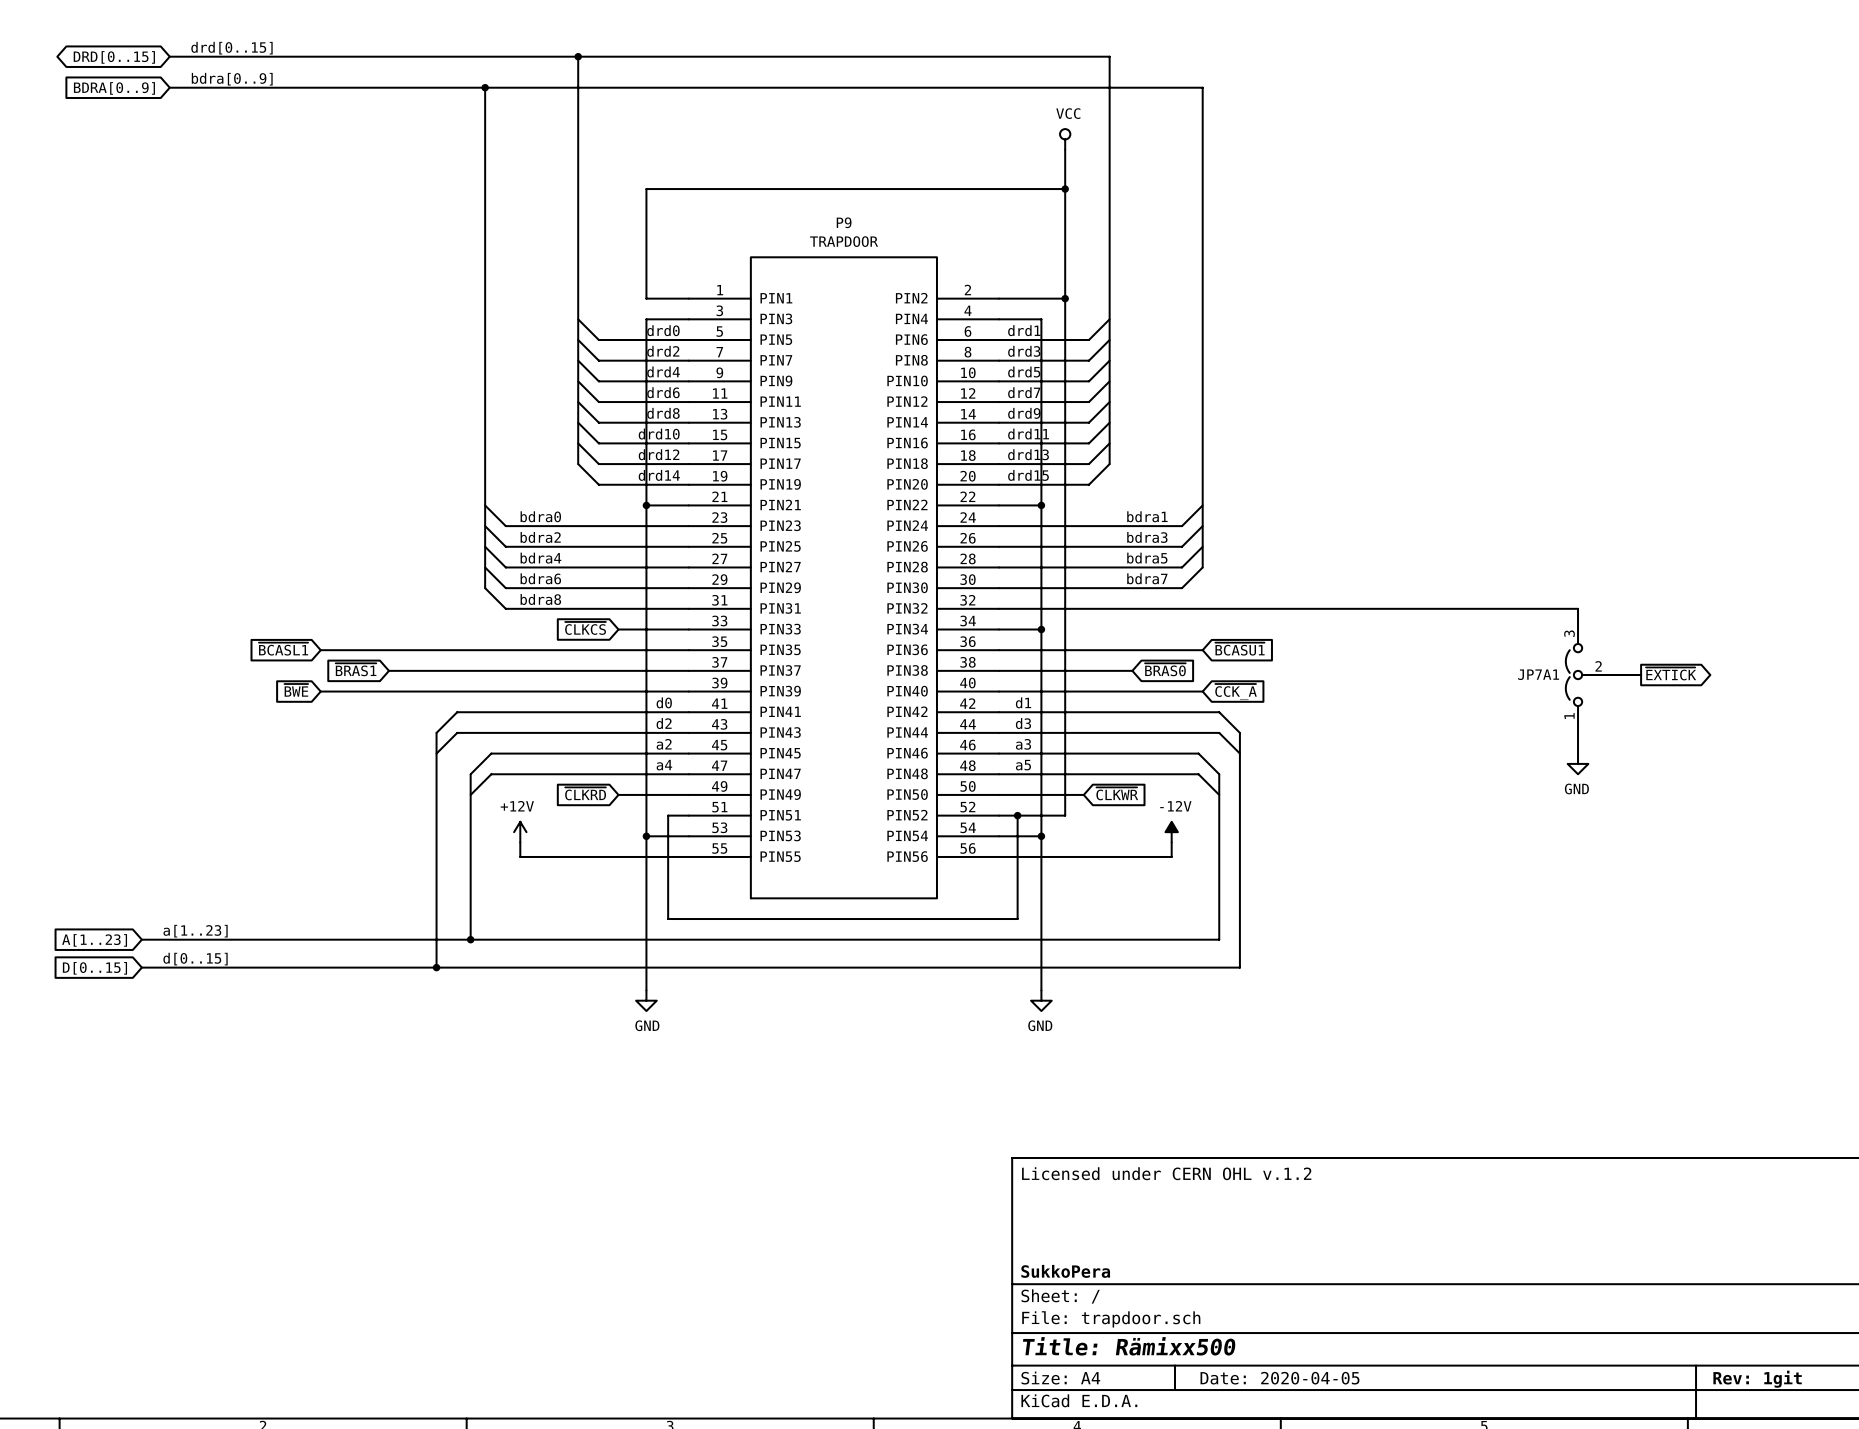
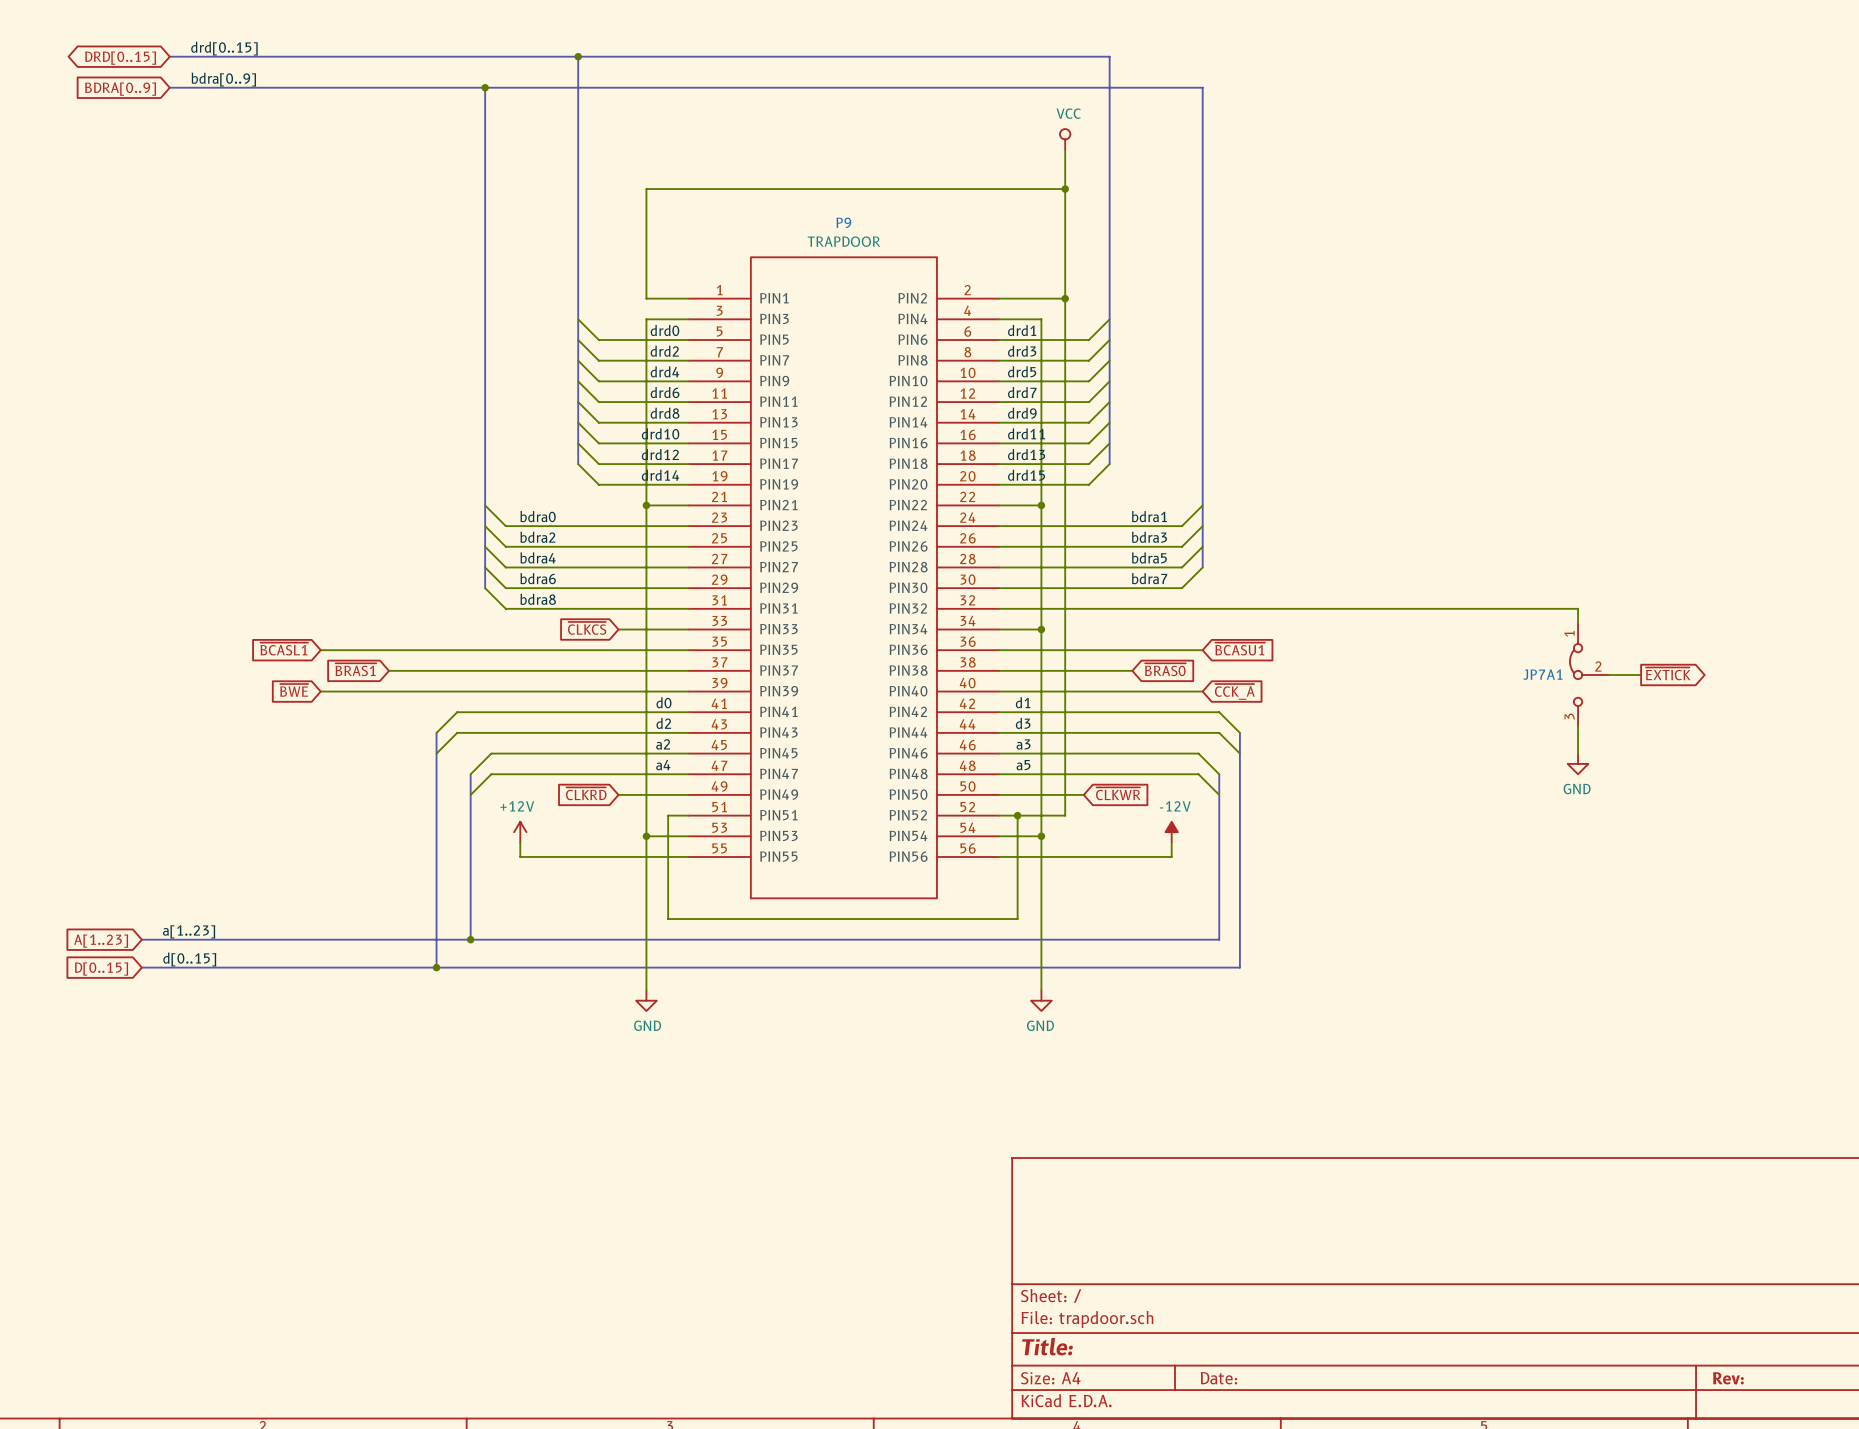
JP7A1 symbol: [1565, 623, 1610, 727] -> [1569, 623, 1610, 727]
title block: Licensed under CERN OHL v.1.2 (1166, 1173) -> none
title block: SukkoPera (1065, 1271) -> none
title block: Title: Rämixx500 (1129, 1346) -> Title: (1047, 1346)
title block: Date: 2020-04-05 (1279, 1378) -> Date: (1218, 1378)
title block: Rev: 1git (1757, 1379) -> Rev: (1728, 1378)

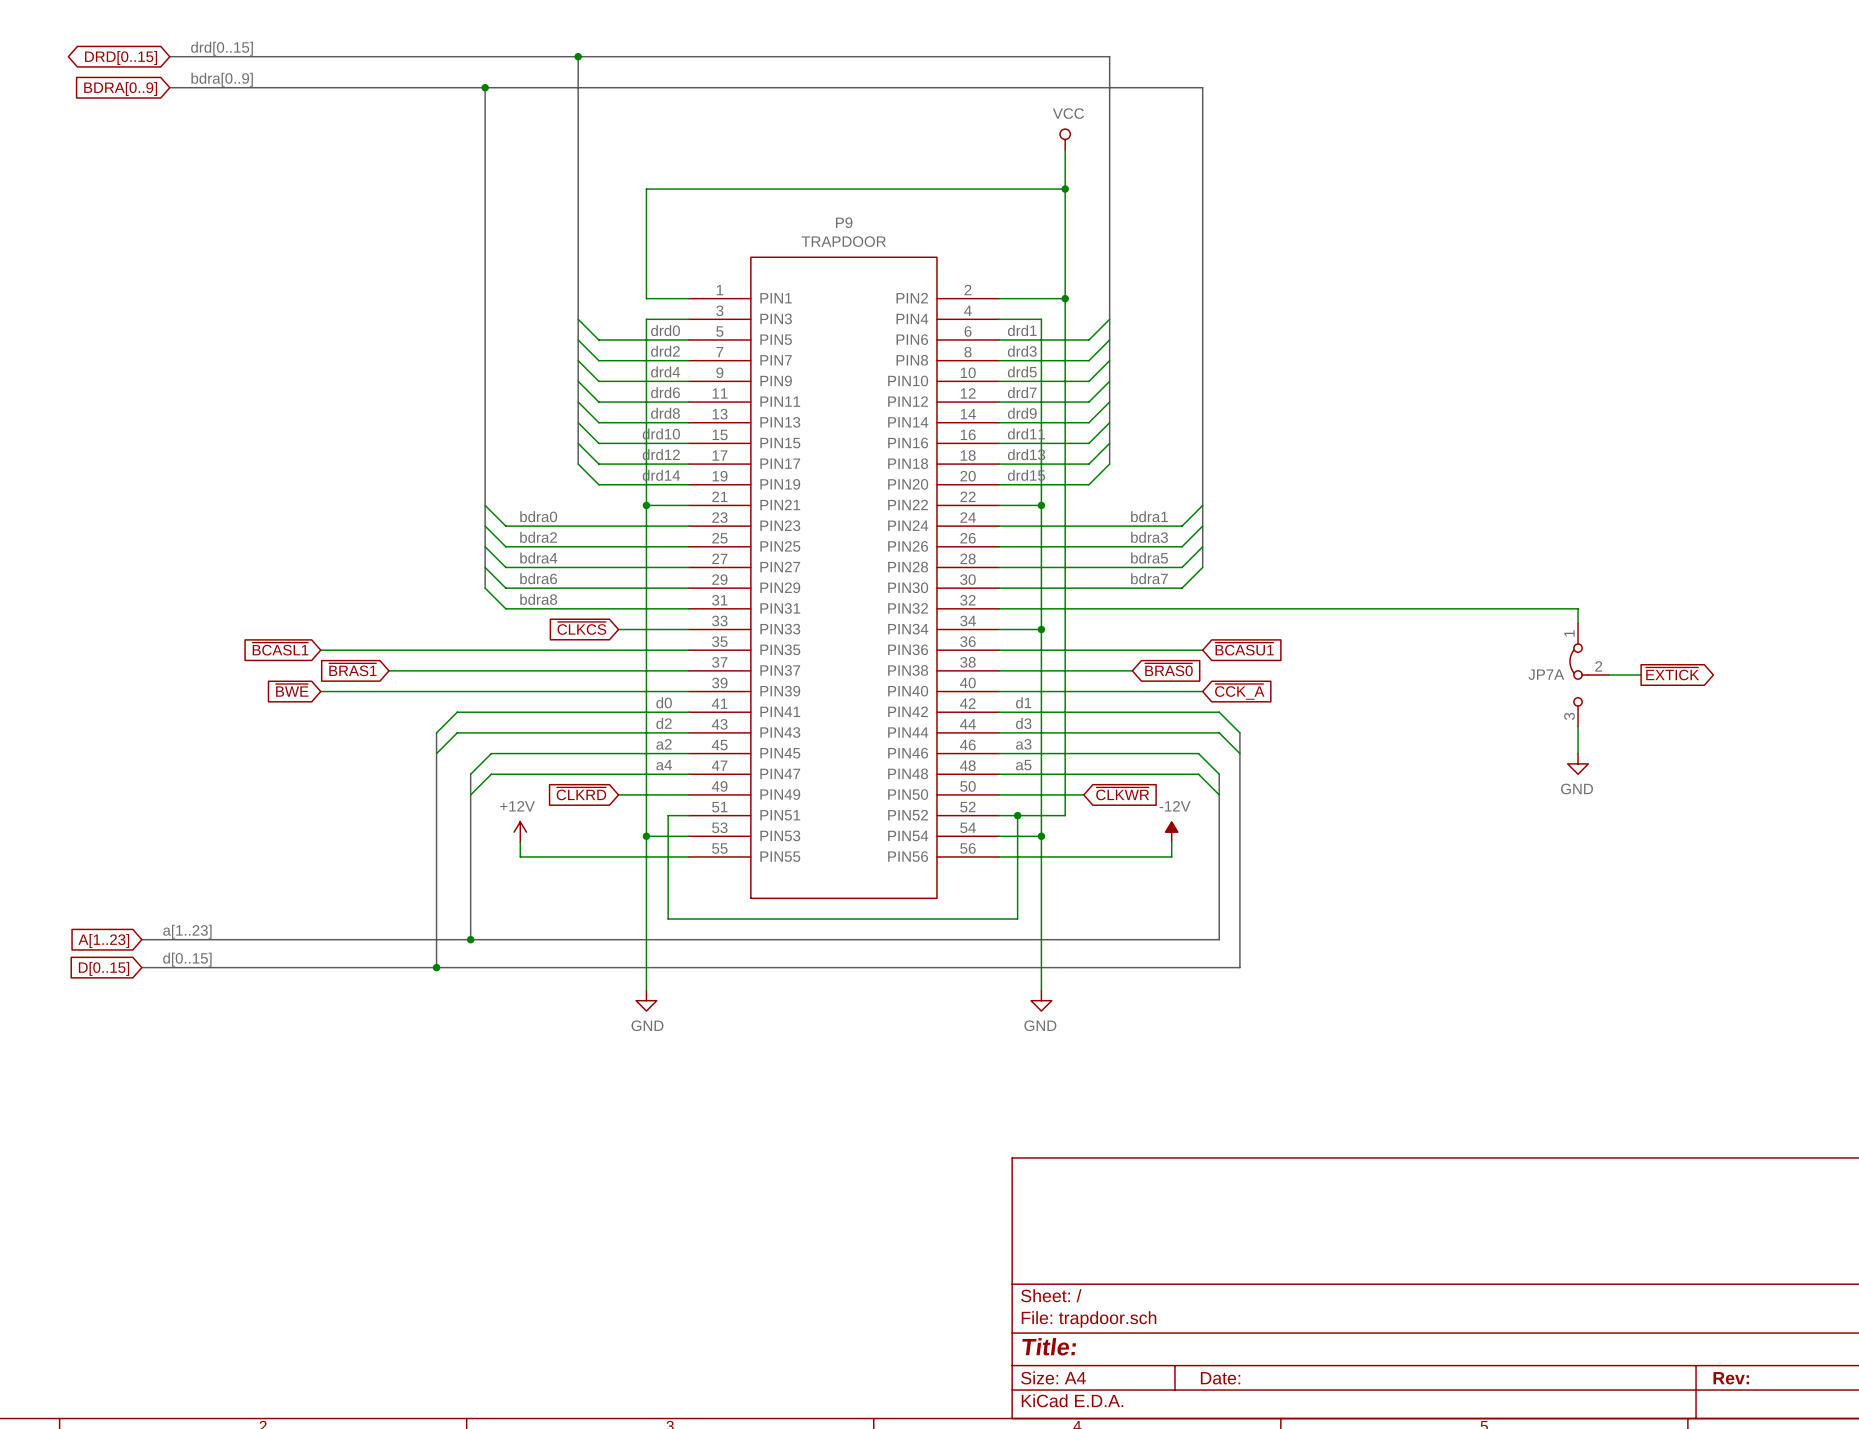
JP7A1 name: JP7A1 (1542, 674) -> JP7A (1546, 674)

